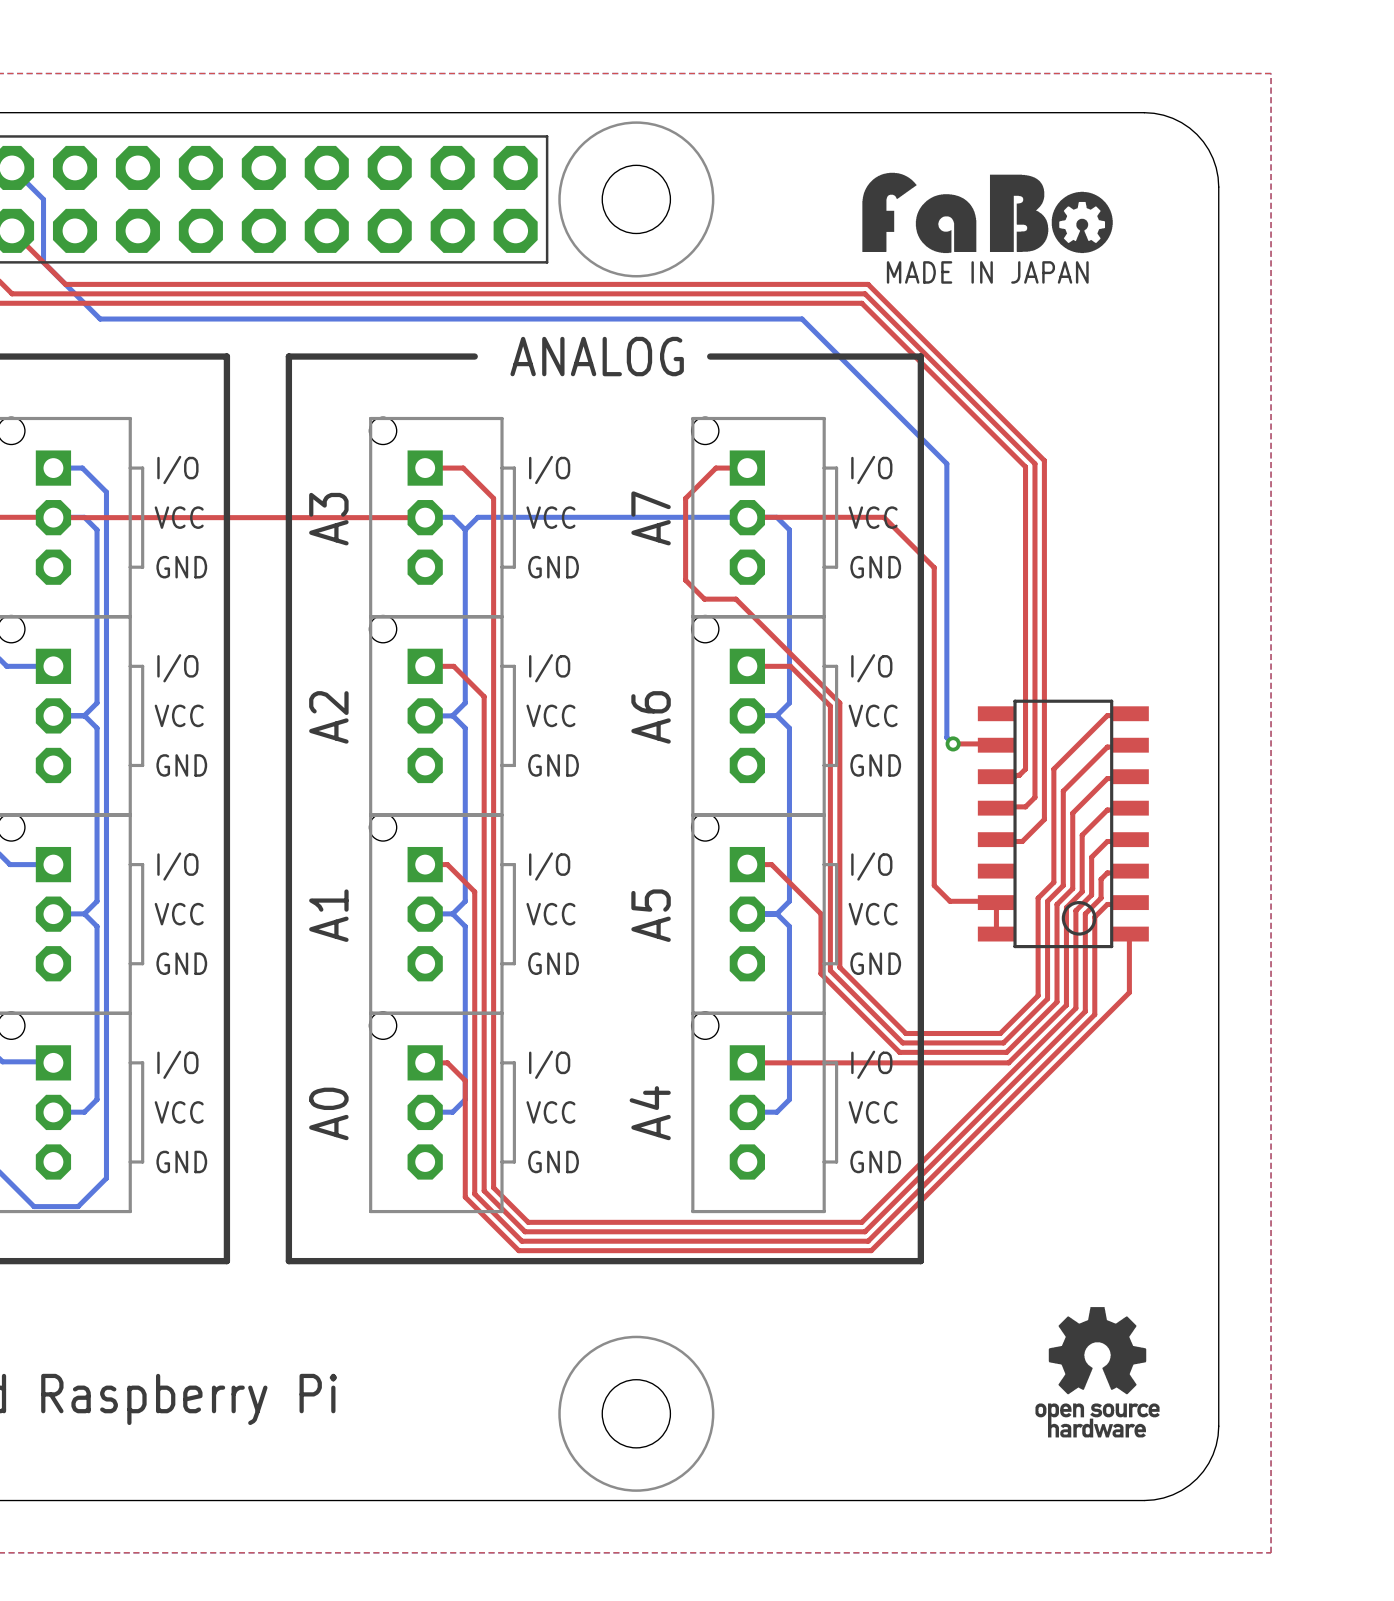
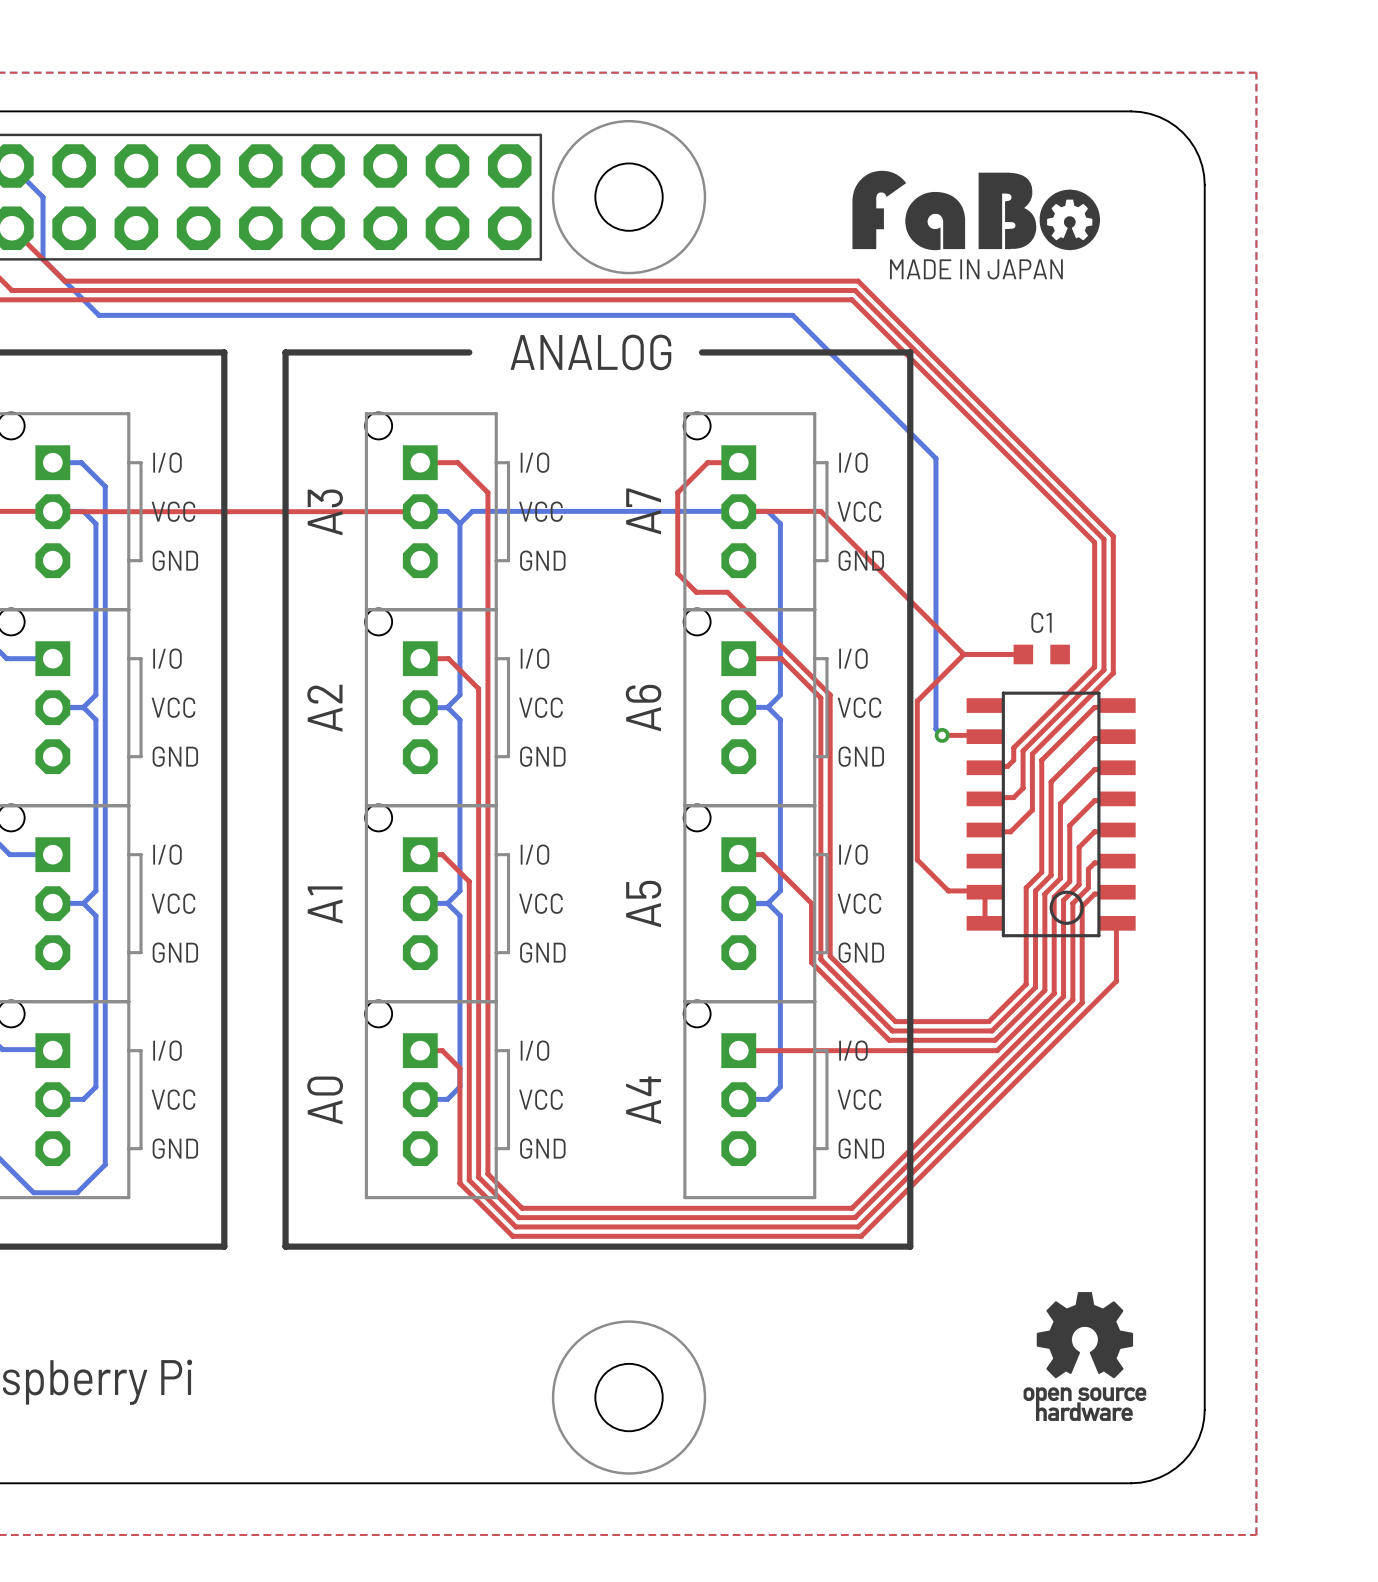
top track: (1044, 460) (1044, 762) -> (1032, 455) (1113, 536) (1113, 673) (1032, 754)
top track: (1034, 463) (1034, 759) -> (1023, 458) (1103, 539) (1103, 670) (1023, 750)
top track: (1025, 466) (1025, 756) -> (1013, 461) (1094, 542) (1094, 666) (1013, 747)
top track: (830, 517) (883, 517) (934, 567) (934, 885) (949, 901) (959, 901) -> (963, 654) (917, 701) (917, 859) (948, 890)
top track: none -> (820, 511) (963, 654)
top track: none -> (963, 654) (1023, 654)
C1: none -> (1041, 654)

